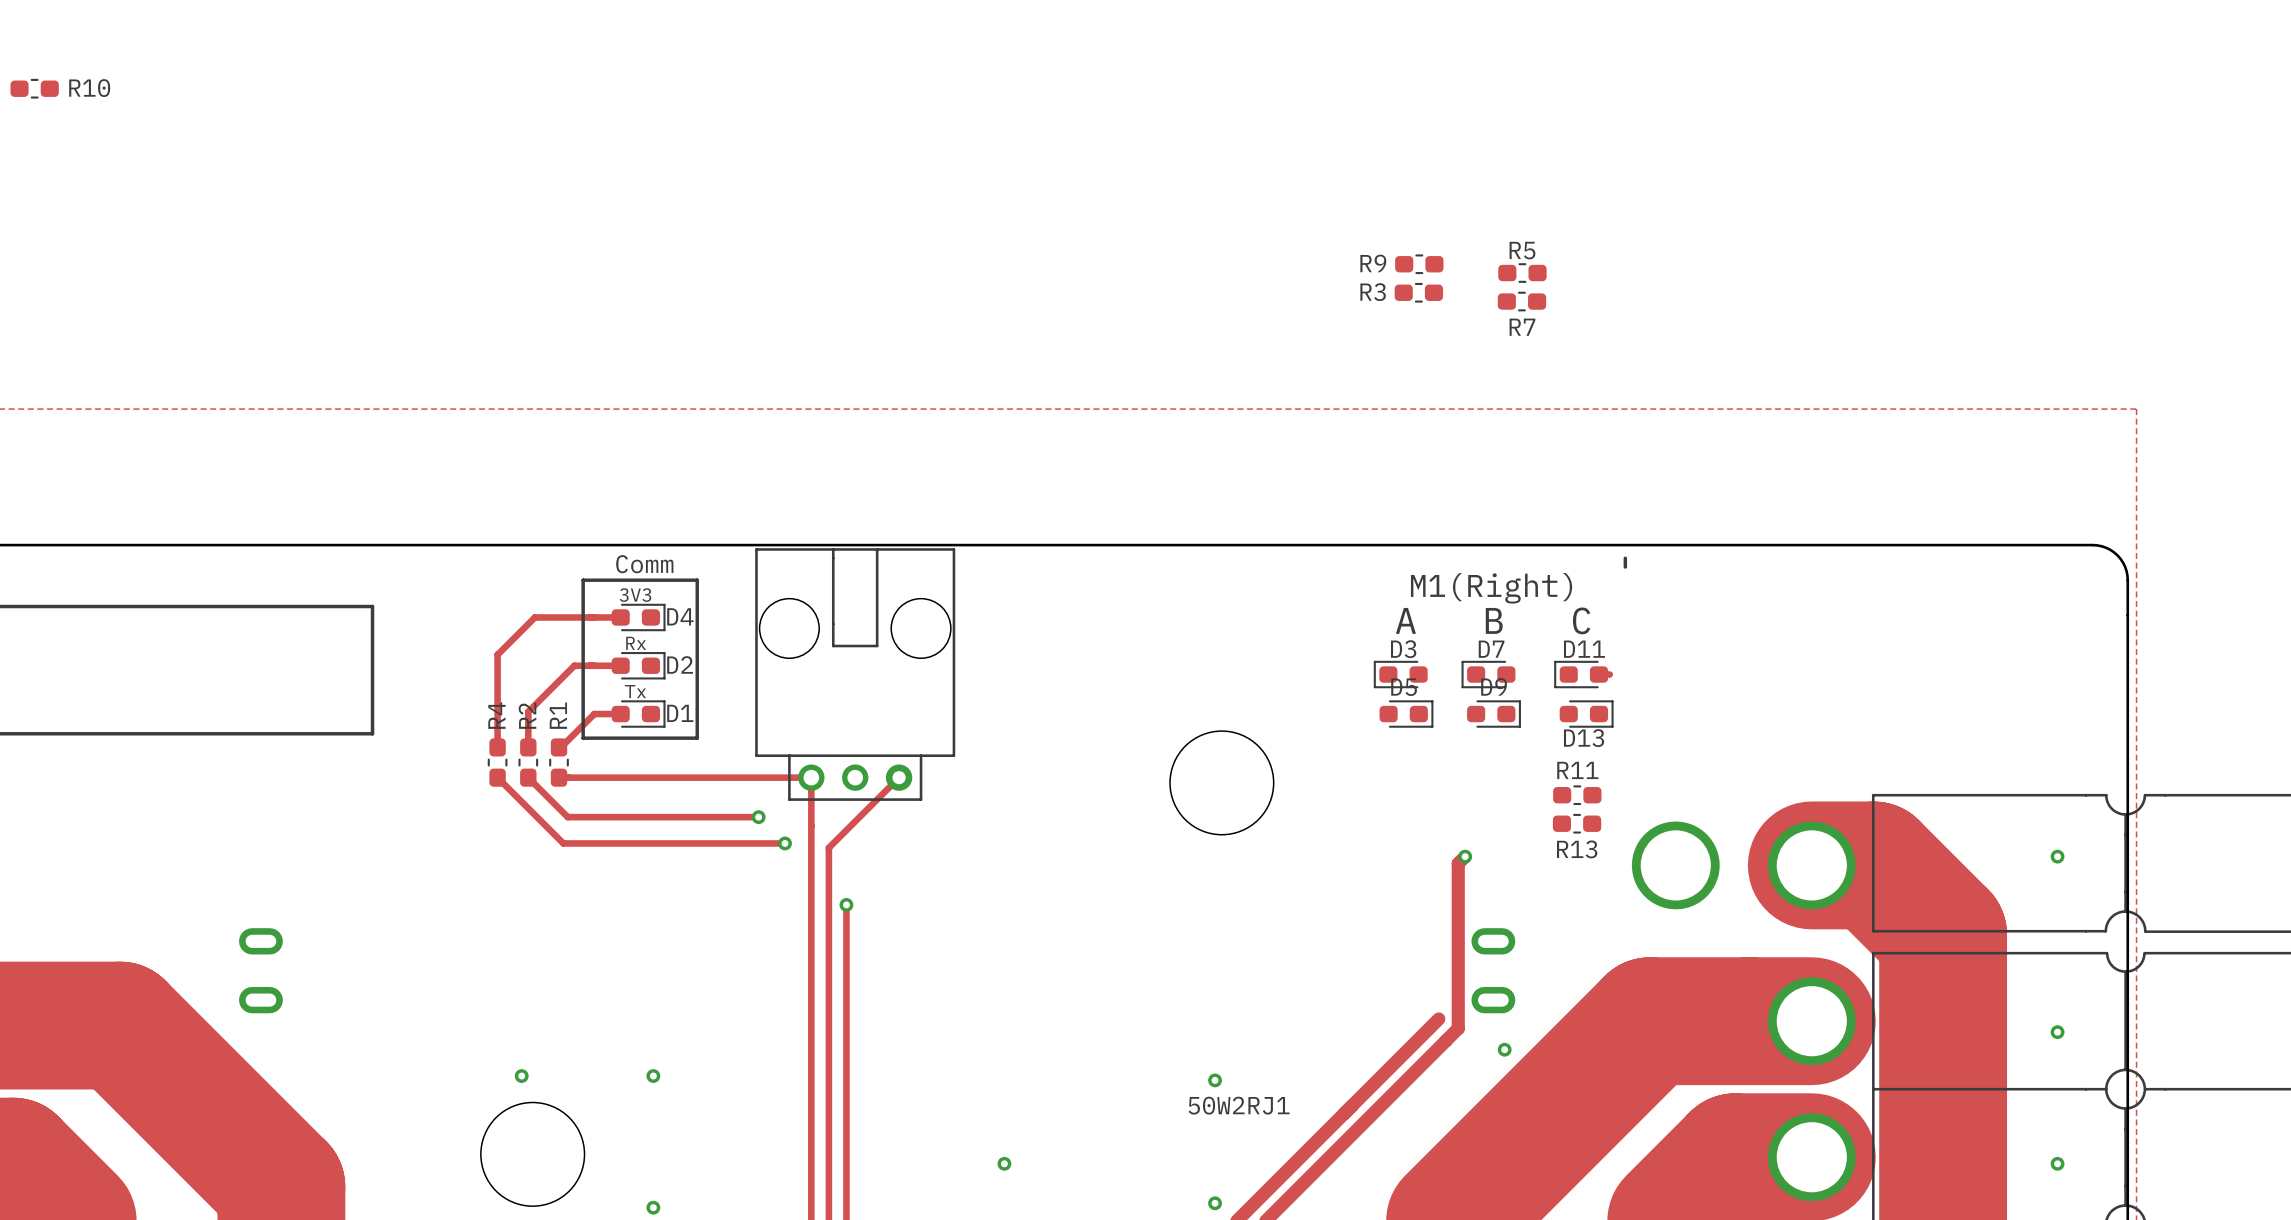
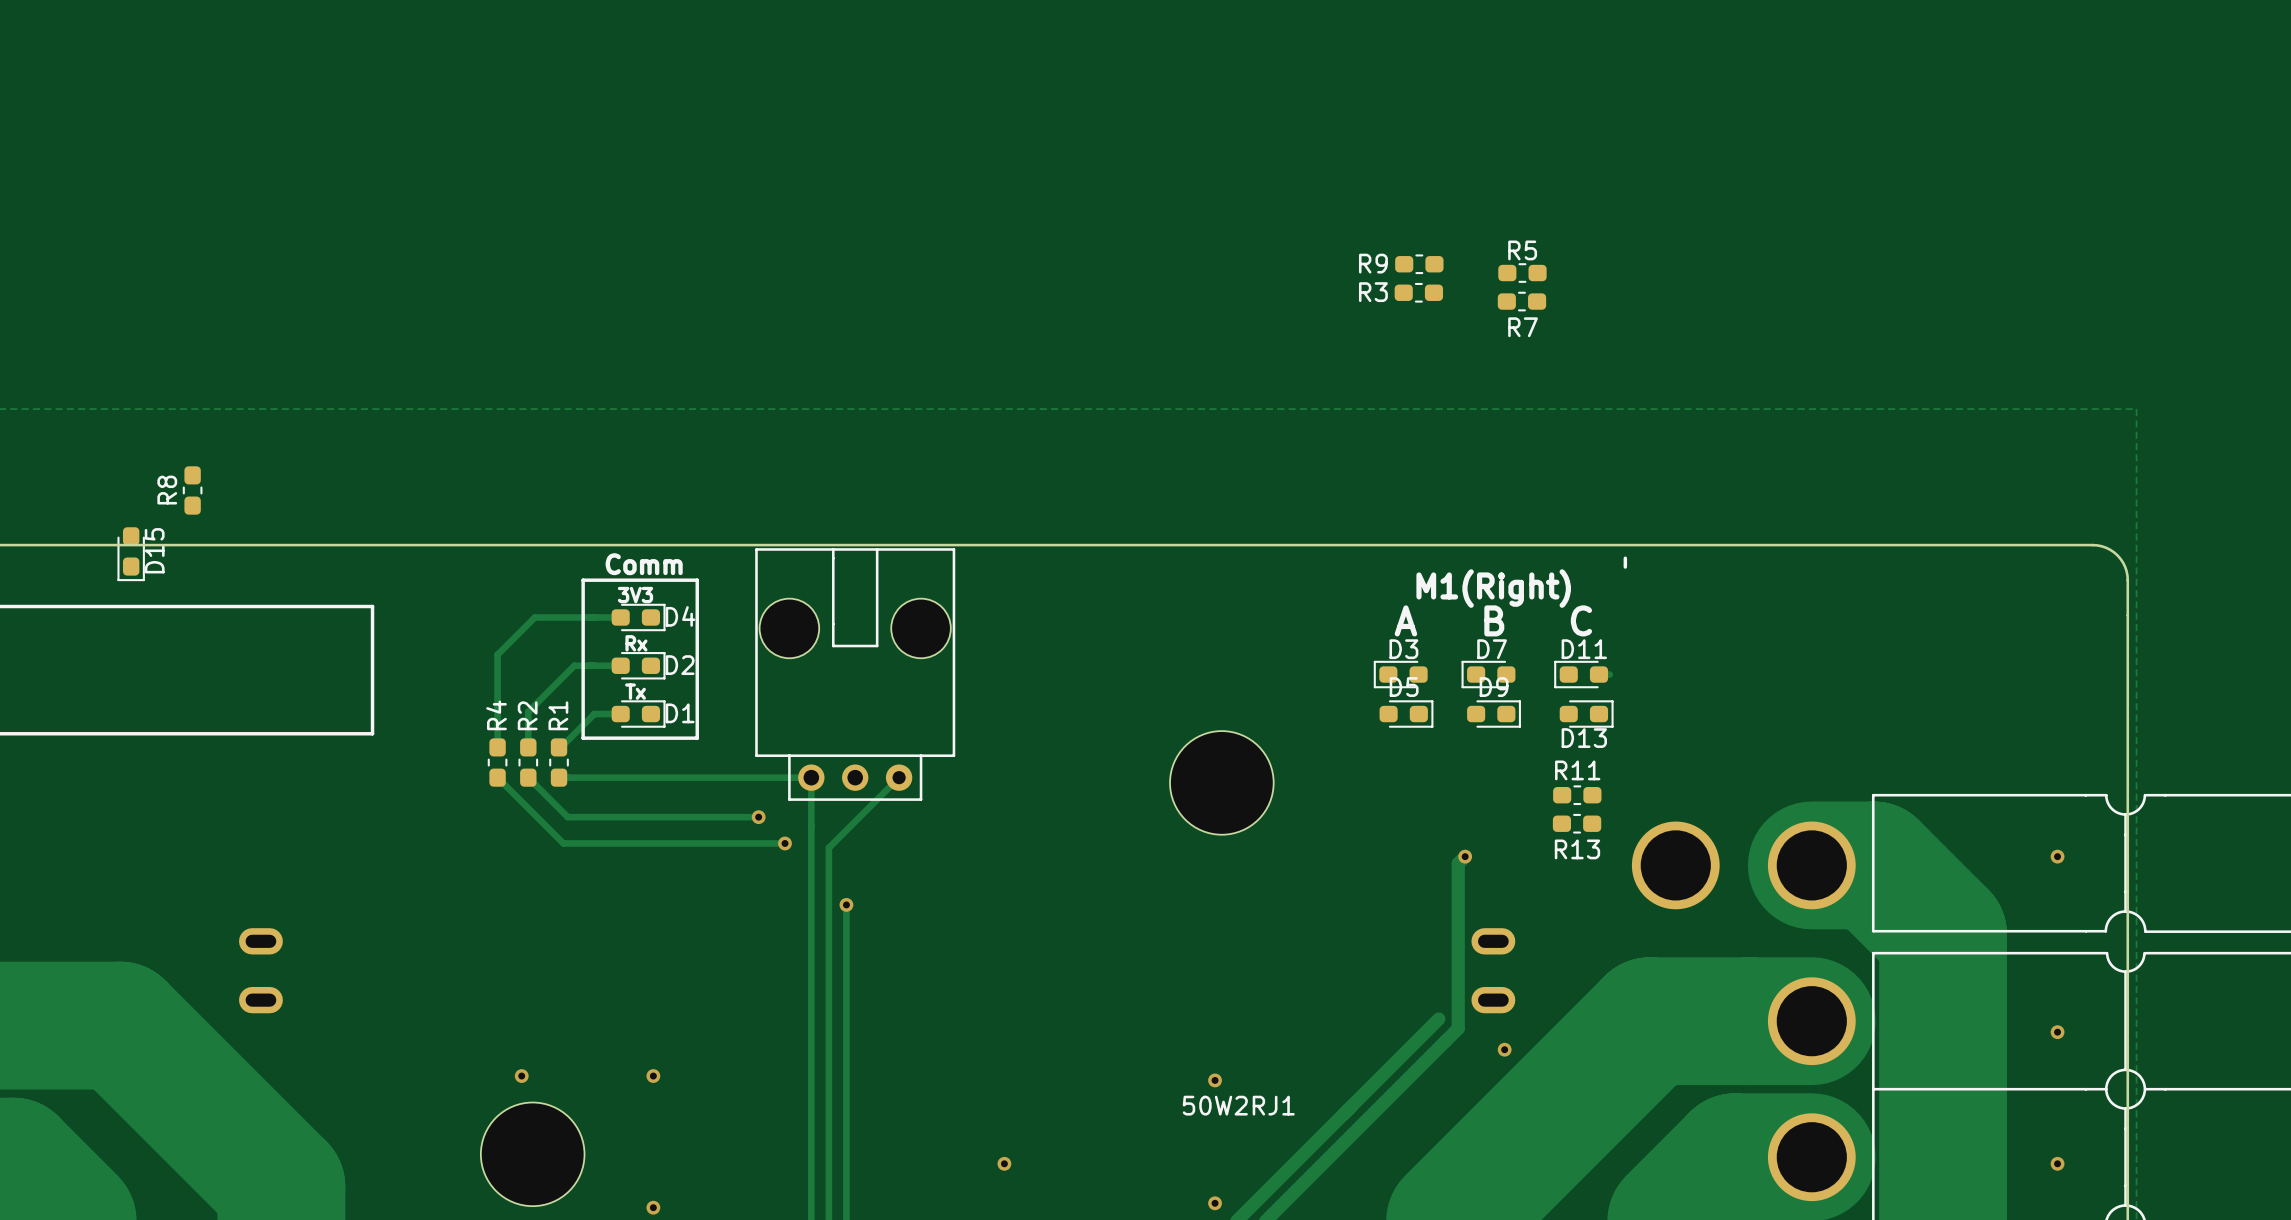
R10: (34, 88) -> none
R8: none -> (192, 490)
D15: none -> (131, 554)

